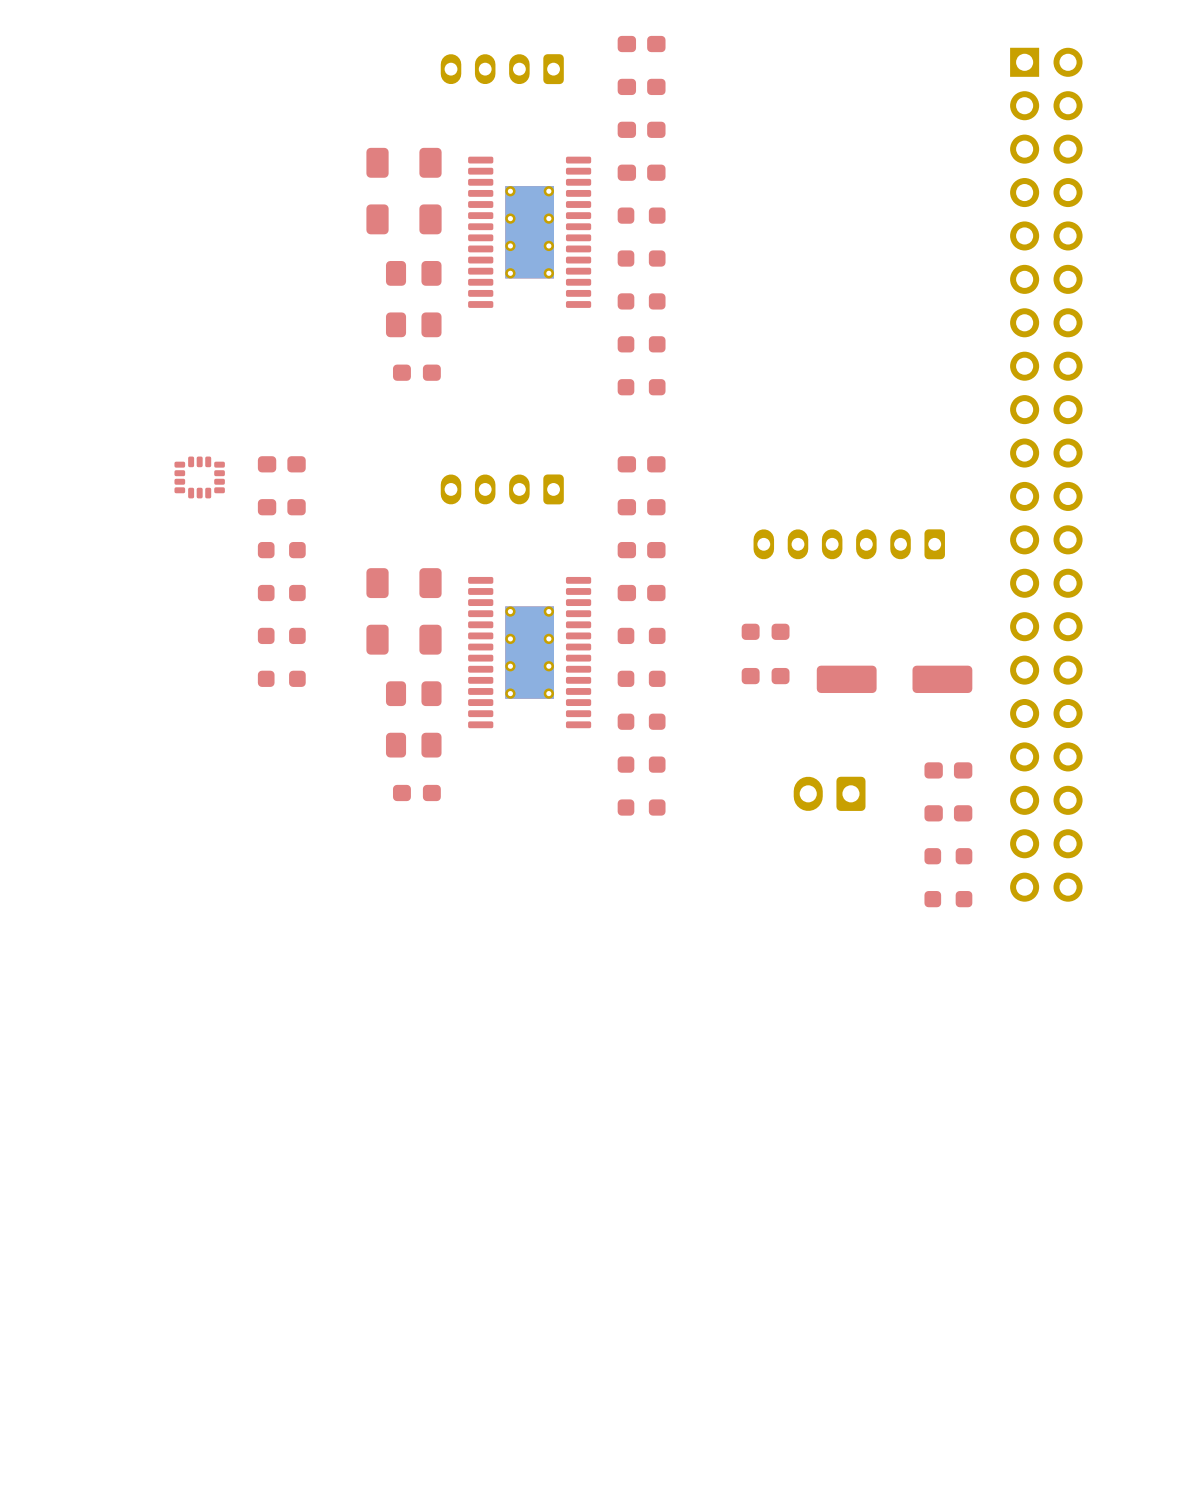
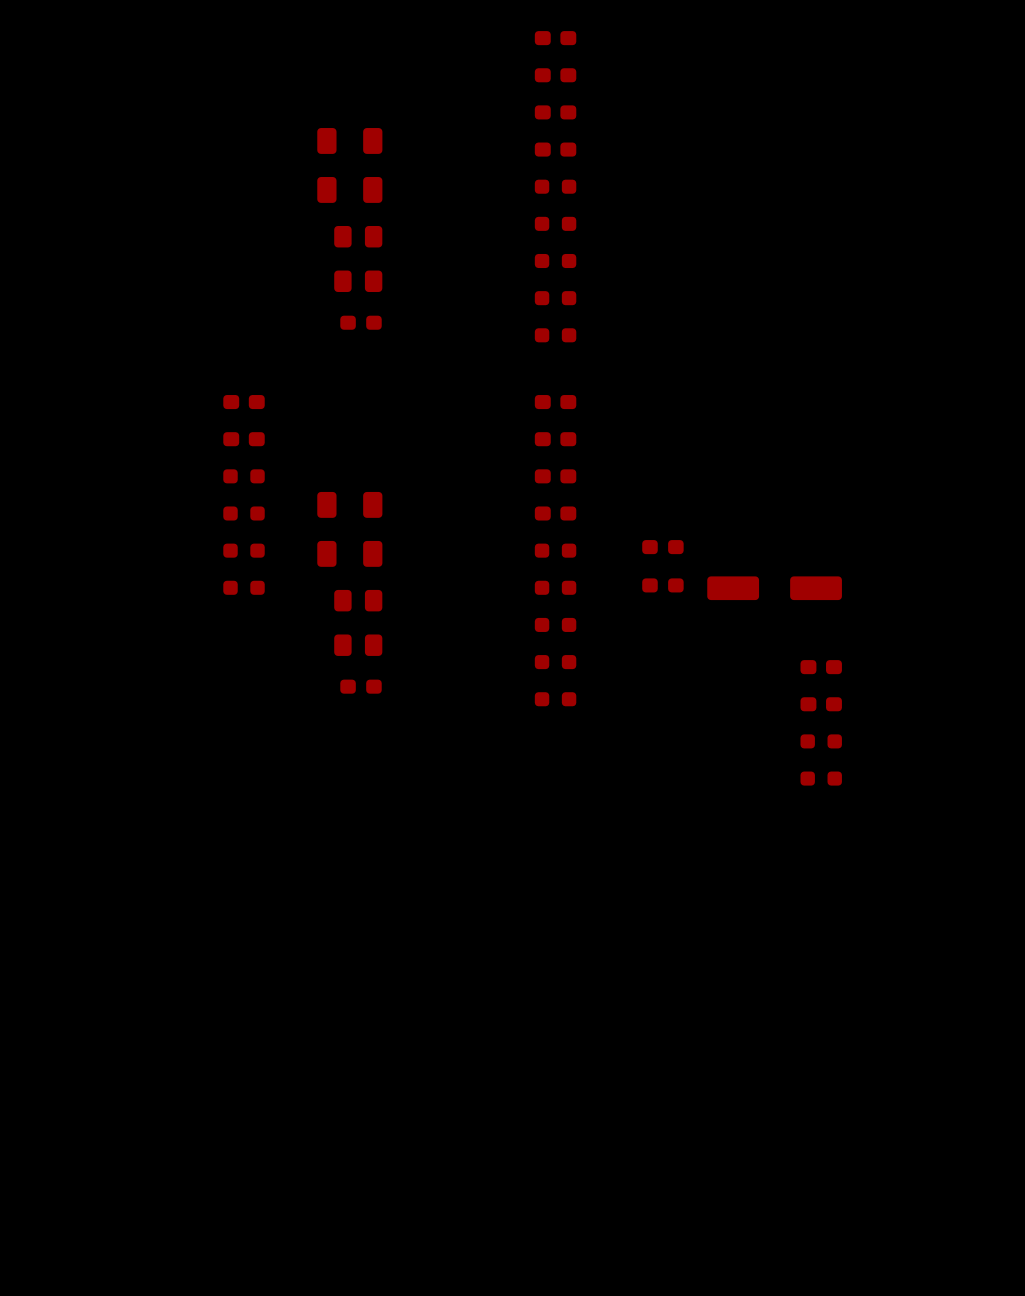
part: (502, 69) -> none
part: (529, 232) -> none
part: (1046, 474) -> none
part: (199, 477) -> none
part: (502, 489) -> none
part: (849, 544) -> none
part: (529, 652) -> none
part: (829, 793) -> none

